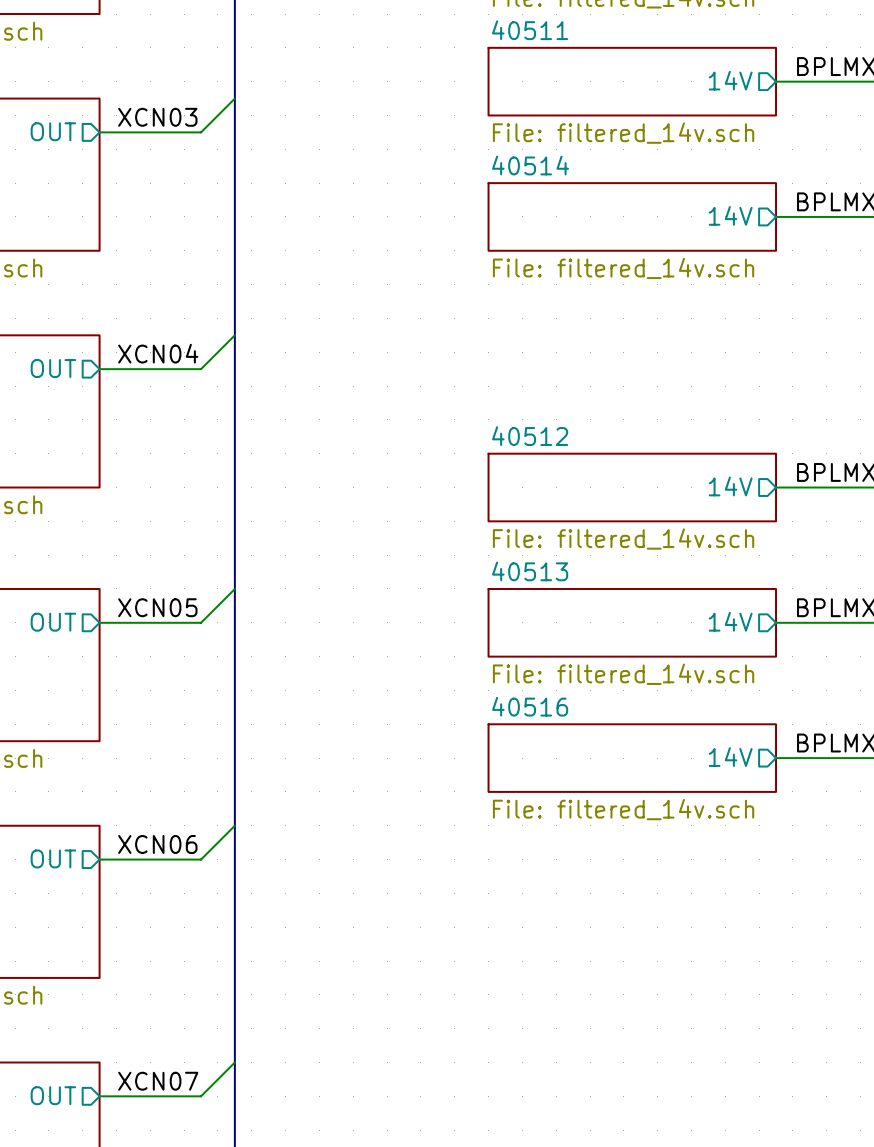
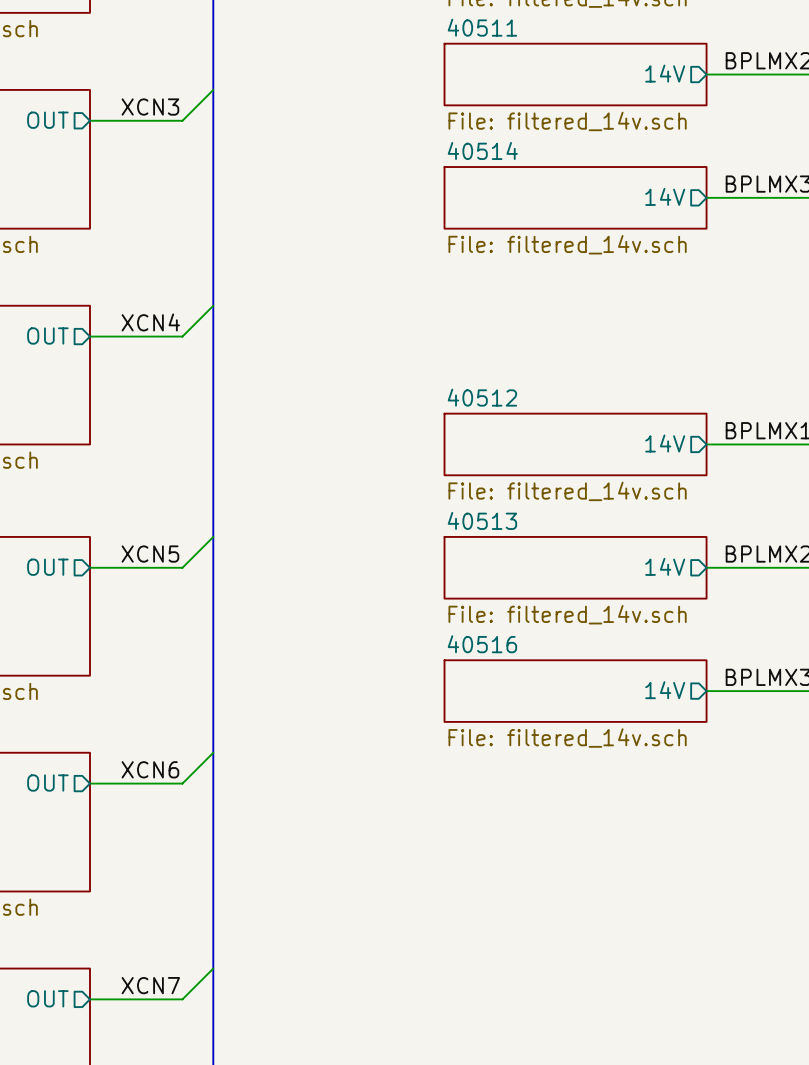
label: XCN03 (157, 117) -> XCN3 (150, 107)
label: XCN04 (158, 353) -> XCN4 (150, 322)
label: XCN05 (157, 607) -> XCN5 (150, 554)
label: XCN06 (157, 844) -> XCN6 (150, 769)
label: XCN07 (158, 1081) -> XCN7 (150, 985)

